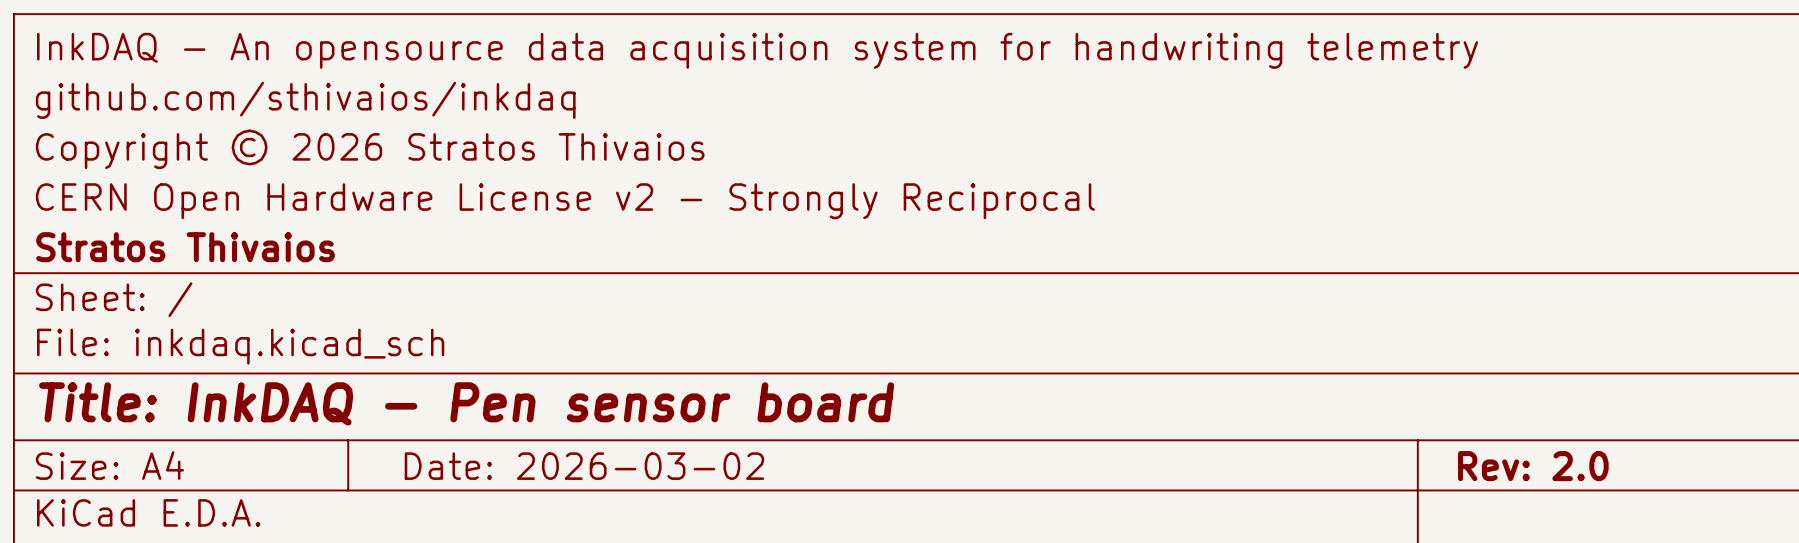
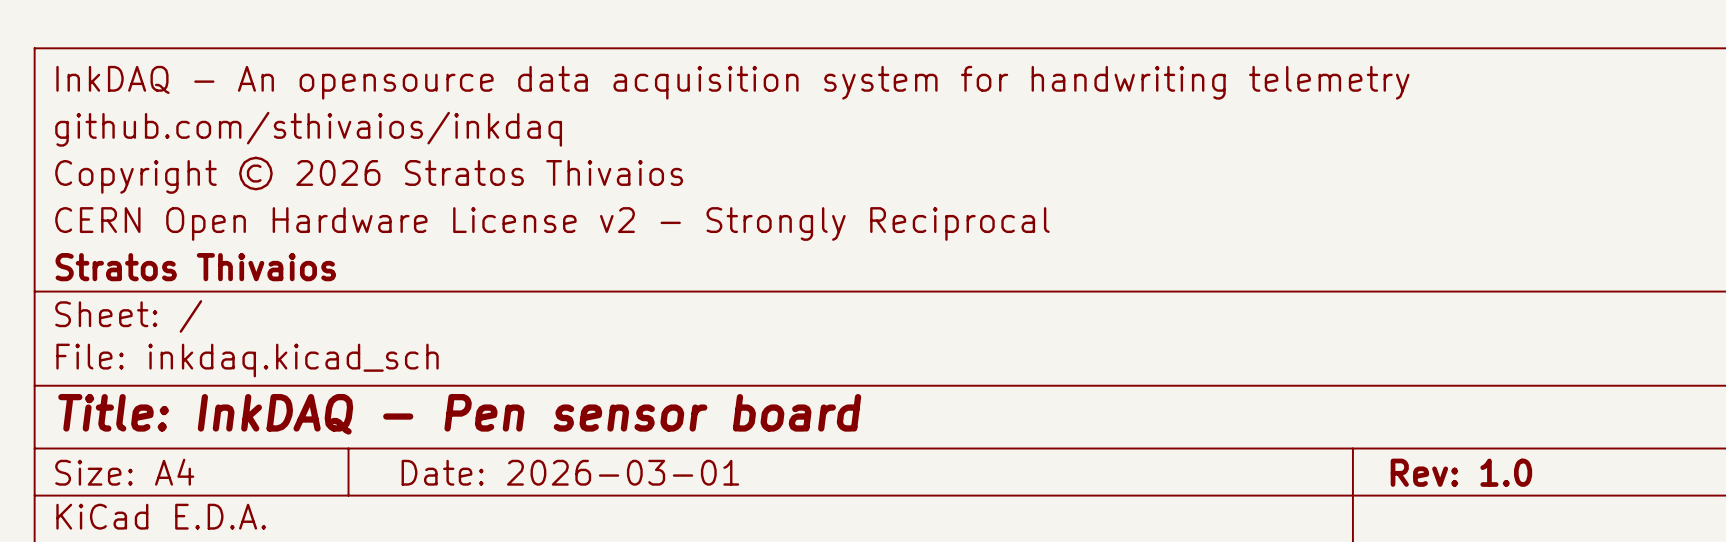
title block: Date: 2026-03-02 (584, 466) -> Date: 2026-03-01 (570, 472)
title block: Rev: 2.0 (1533, 466) -> Rev: 1.0 (1461, 472)

